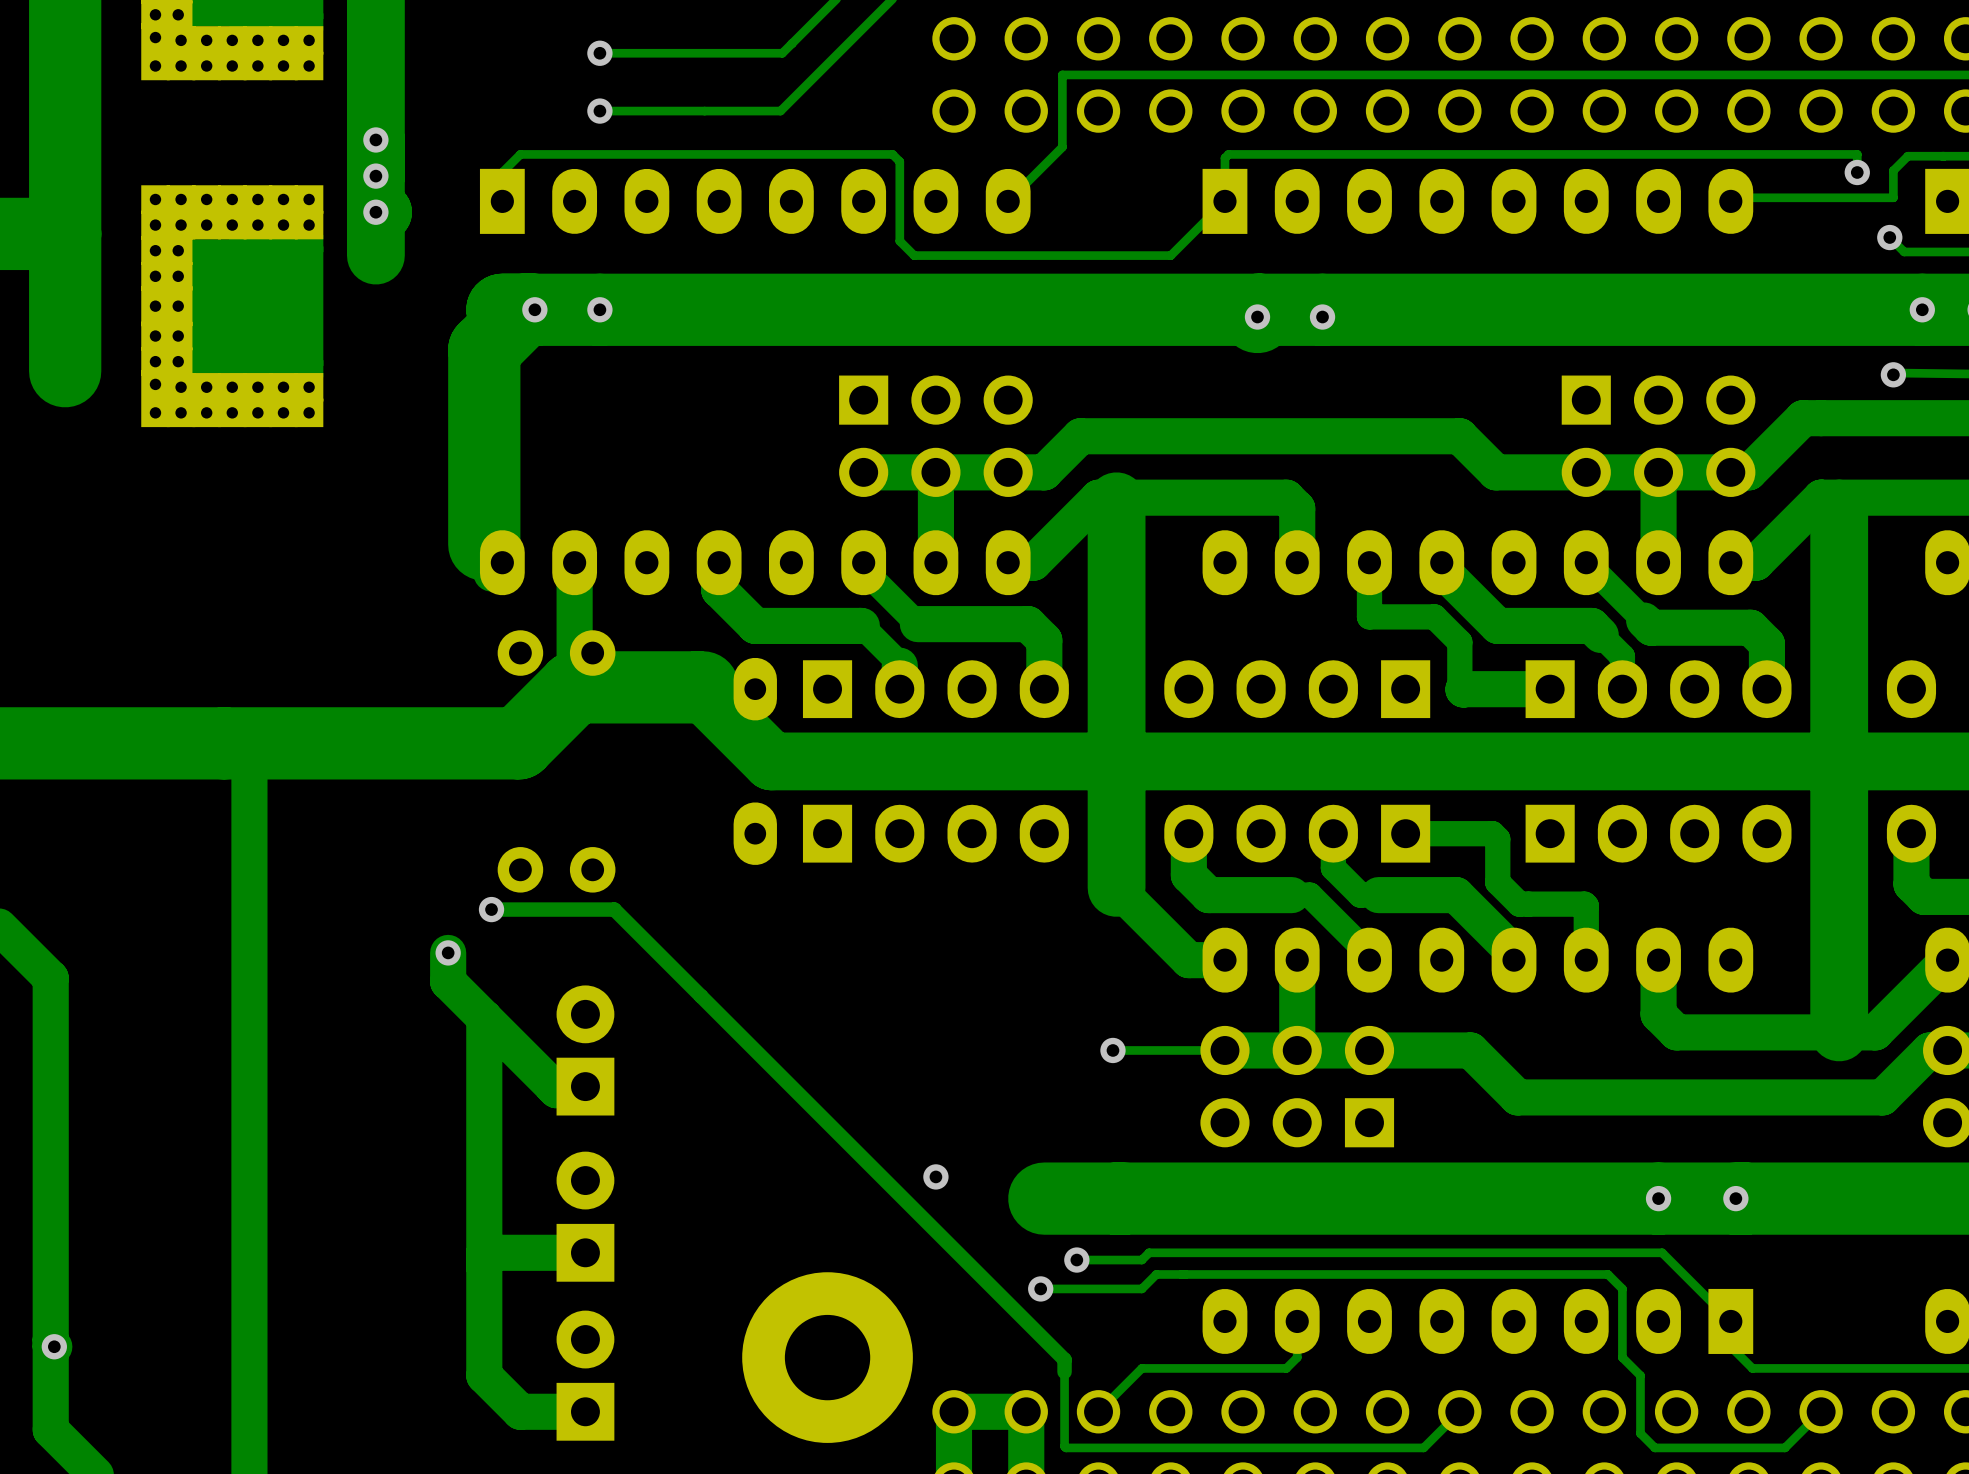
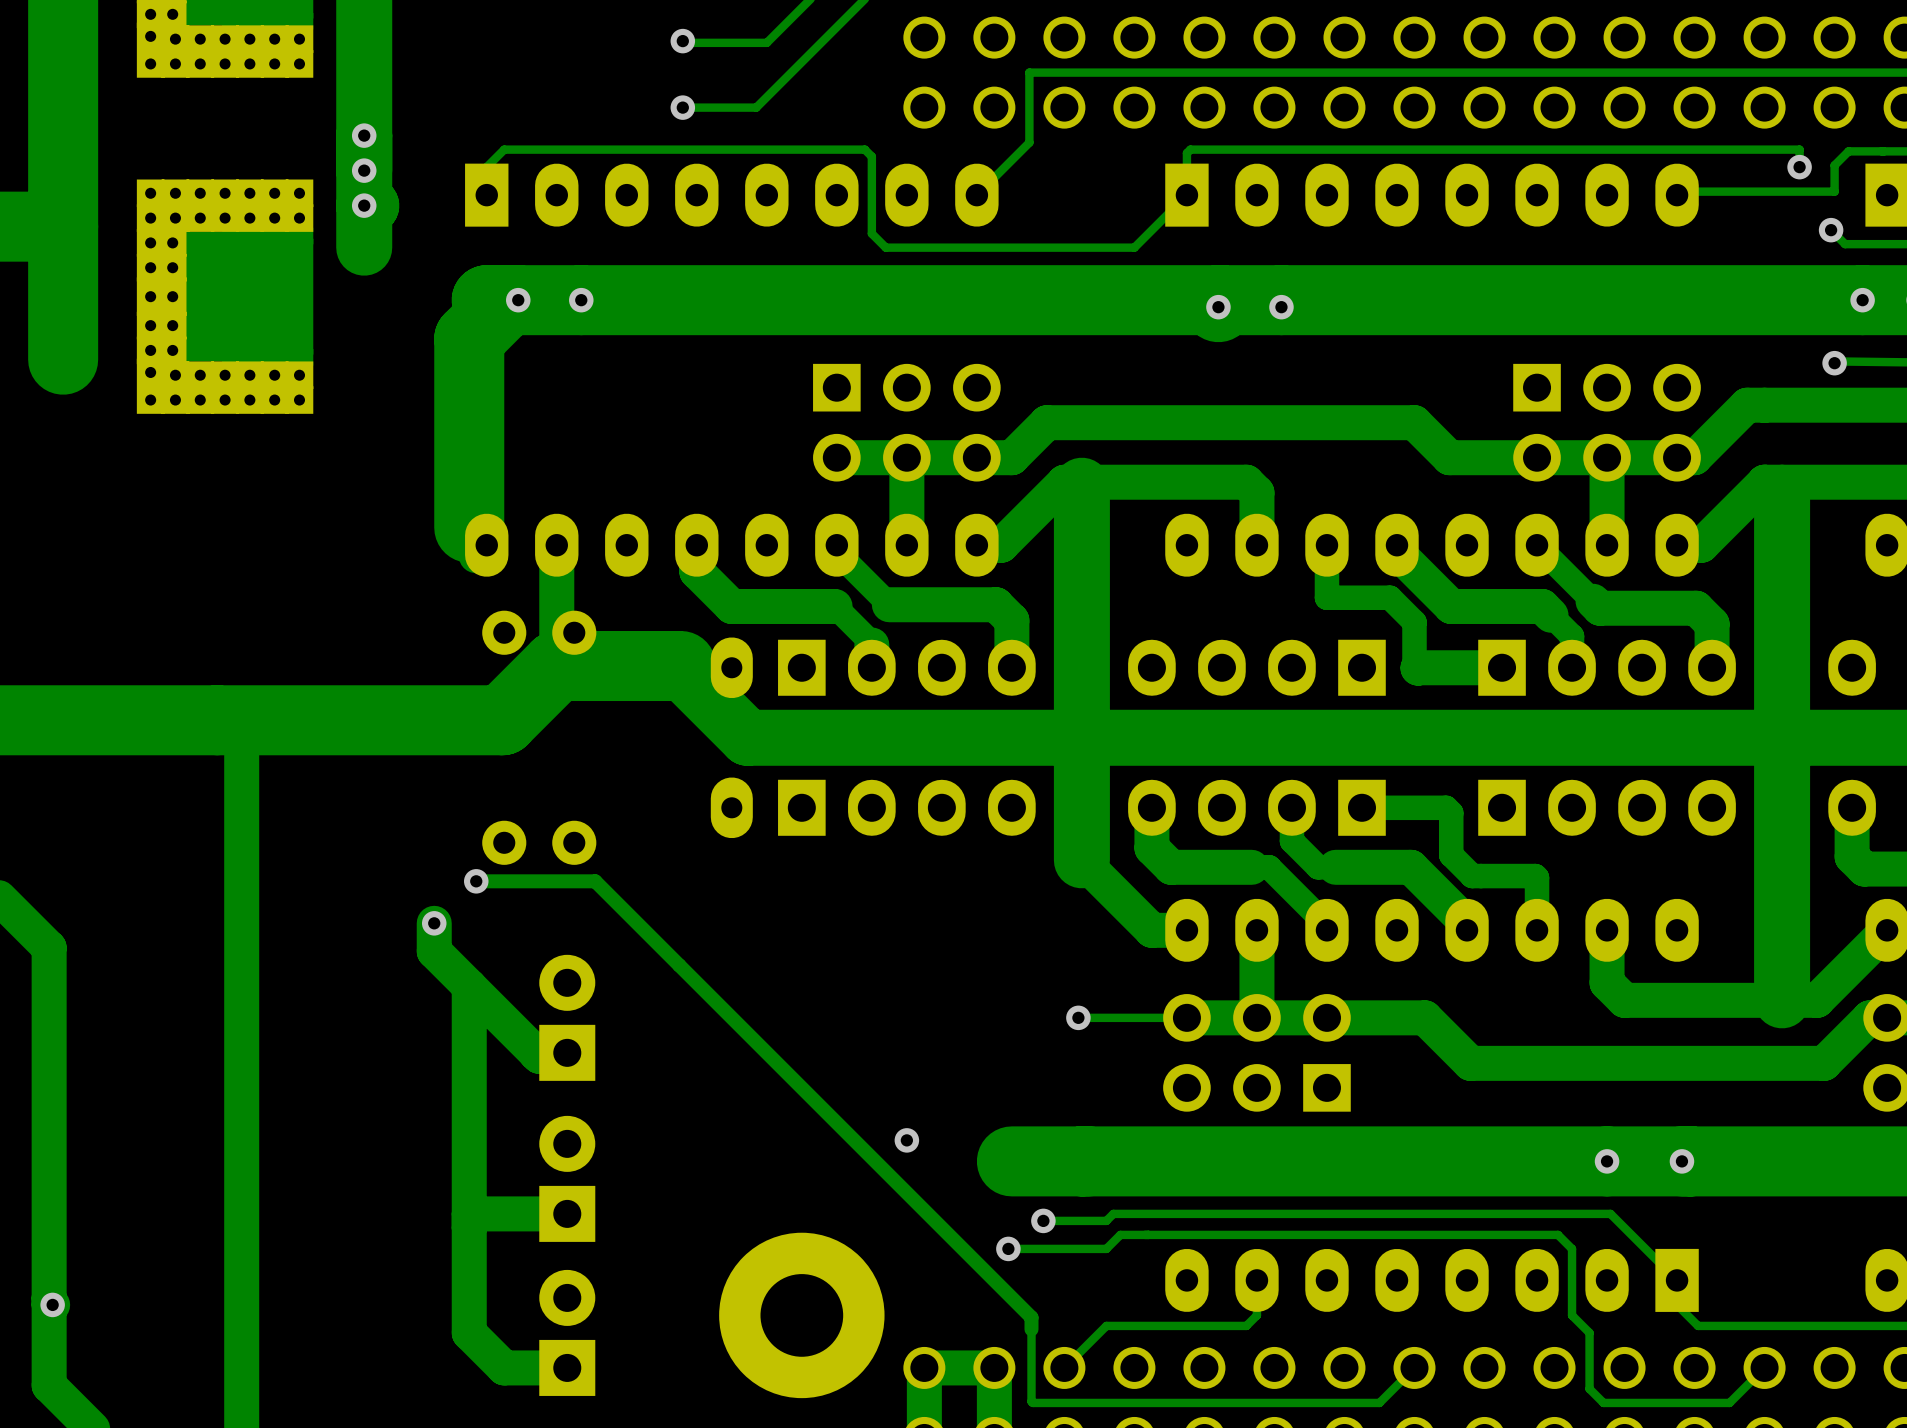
via: none -> (682, 41)
track: (791, 44) (782, 53) (599, 53) -> (766, 42) (684, 42) (682, 41)
via: (599, 53) -> none
via: (599, 111) -> none
track: (704, 111) (599, 111) -> none
via: none -> (682, 107)

